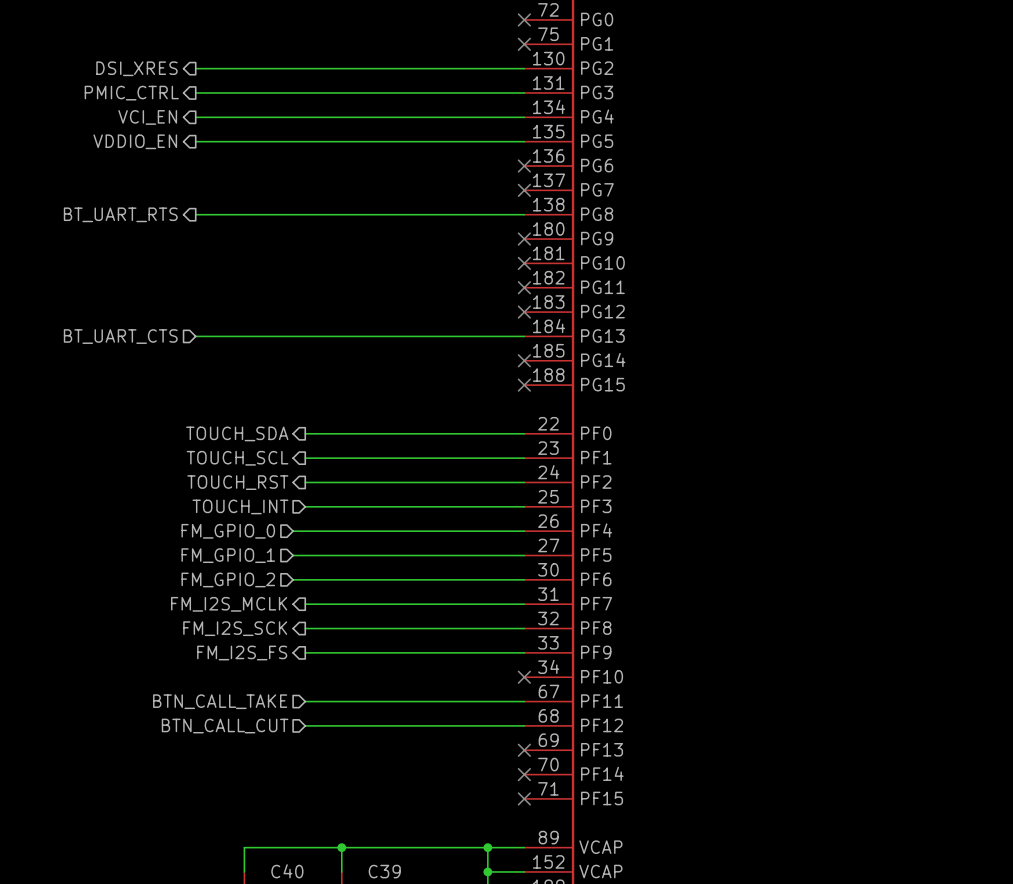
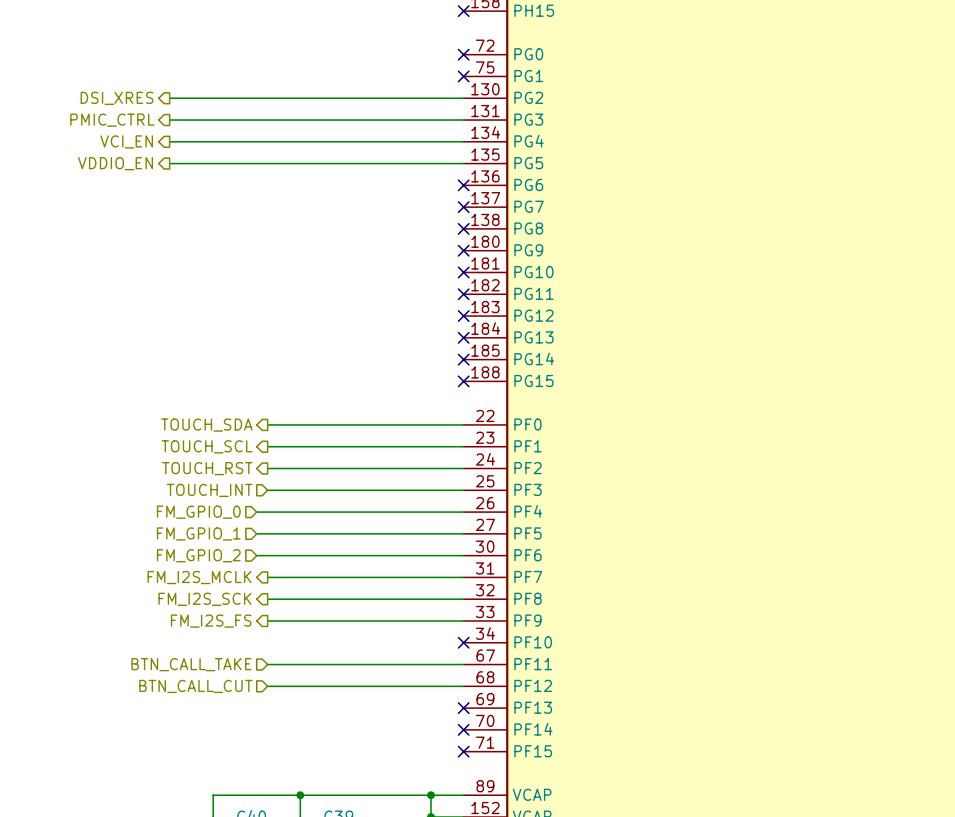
hierarchical label: BT_UART_RTS (120, 214) -> none
wire: (195, 214) (524, 214) -> none
no-connect mark: none -> (463, 228)
hierarchical label: BT_UART_CTS (120, 336) -> none
wire: (195, 336) (524, 336) -> none
no-connect mark: none -> (463, 337)

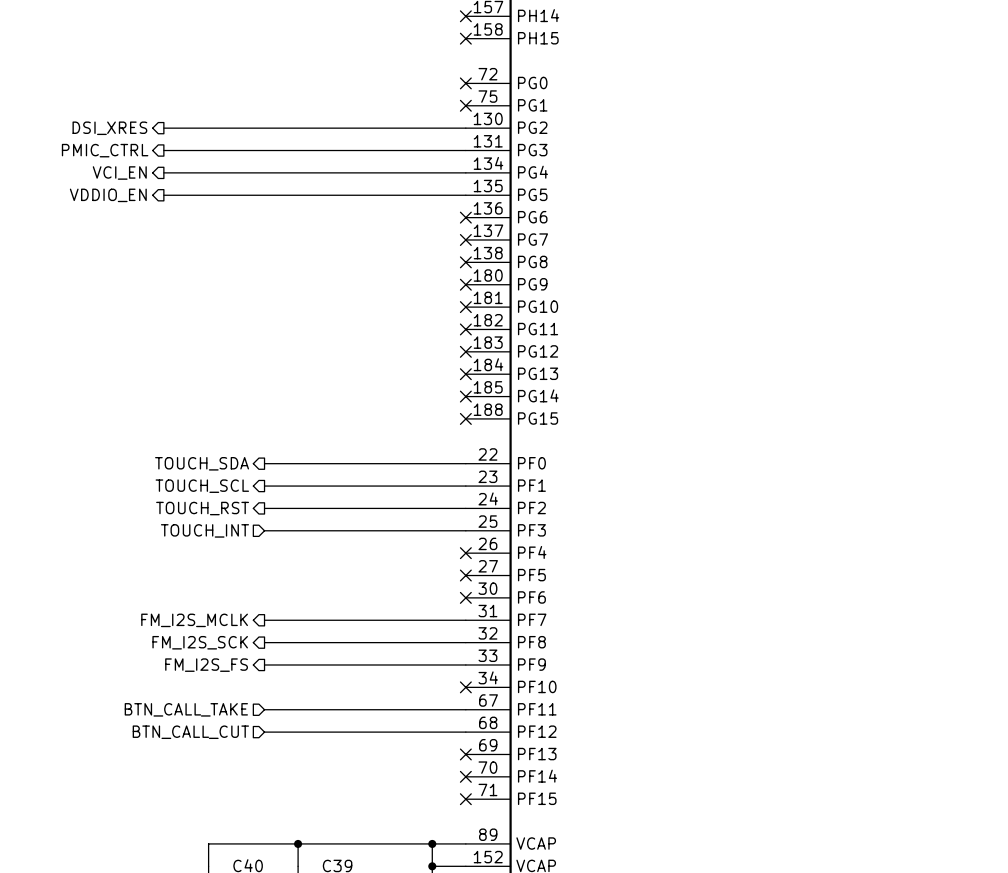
hierarchical label: FM_GPIO_0 (198, 512) -> none
wire: (256, 512) (463, 512) -> none
no-connect mark: none -> (465, 553)
hierarchical label: FM_GPIO_1 (198, 533) -> none
wire: (256, 533) (463, 533) -> none
no-connect mark: none -> (465, 575)
hierarchical label: FM_GPIO_2 (198, 555) -> none
wire: (256, 555) (463, 555) -> none
no-connect mark: none -> (465, 597)

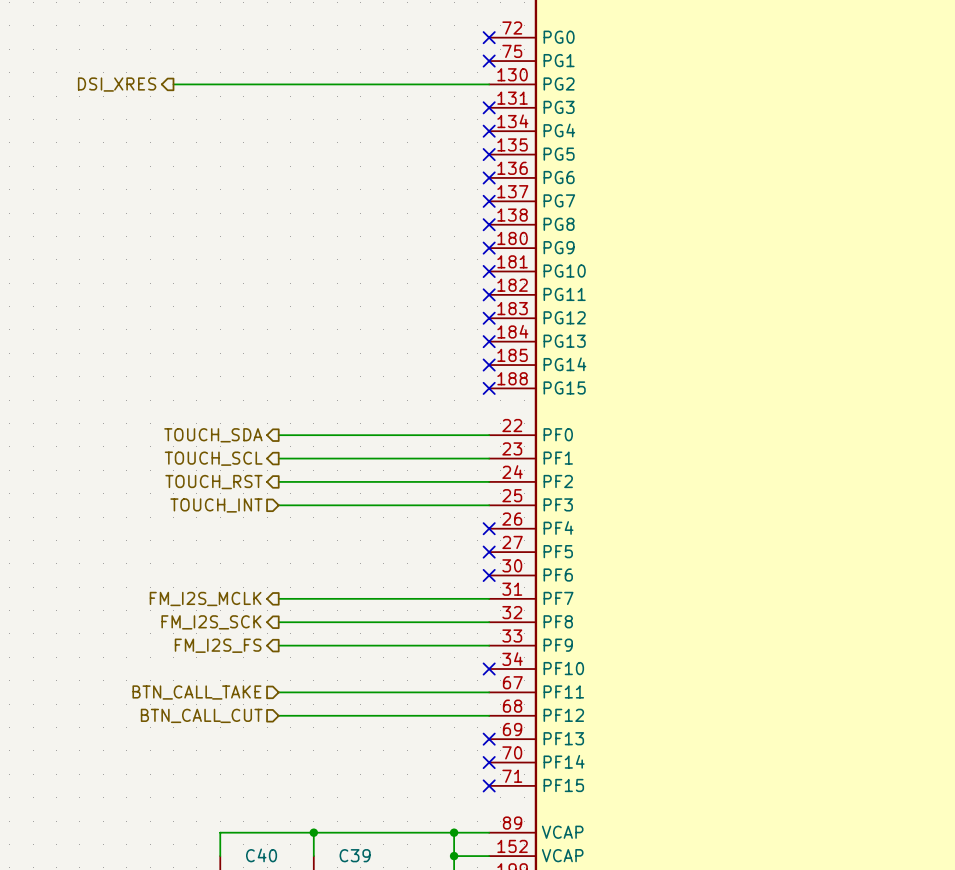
hierarchical label: PMIC_CTRL (105, 150) -> none
wire: (163, 150) (465, 150) -> none
no-connect mark: none -> (489, 107)
wire: (163, 172) (465, 172) -> none
no-connect mark: none -> (489, 131)
hierarchical label: VCI_EN (119, 173) -> none
hierarchical label: VDDIO_EN (108, 195) -> none
wire: (163, 195) (465, 195) -> none
no-connect mark: none -> (489, 154)

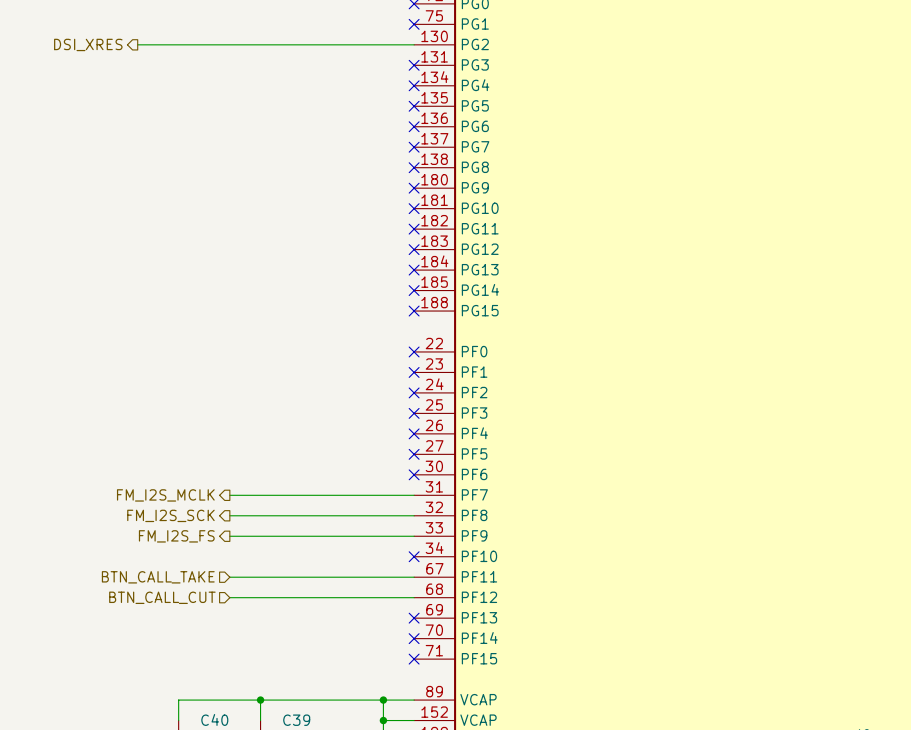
hierarchical label: TOUCH_SDA (213, 435) -> none
wire: (278, 435) (489, 435) -> none
no-connect mark: none -> (414, 351)
hierarchical label: TOUCH_SCL (213, 458) -> none
wire: (278, 458) (489, 458) -> none
no-connect mark: none -> (414, 372)
wire: (278, 481) (489, 481) -> none
no-connect mark: none -> (414, 392)
hierarchical label: TOUCH_RST (213, 482) -> none
hierarchical label: TOUCH_INT (216, 505) -> none
wire: (278, 505) (489, 505) -> none
no-connect mark: none -> (414, 413)

